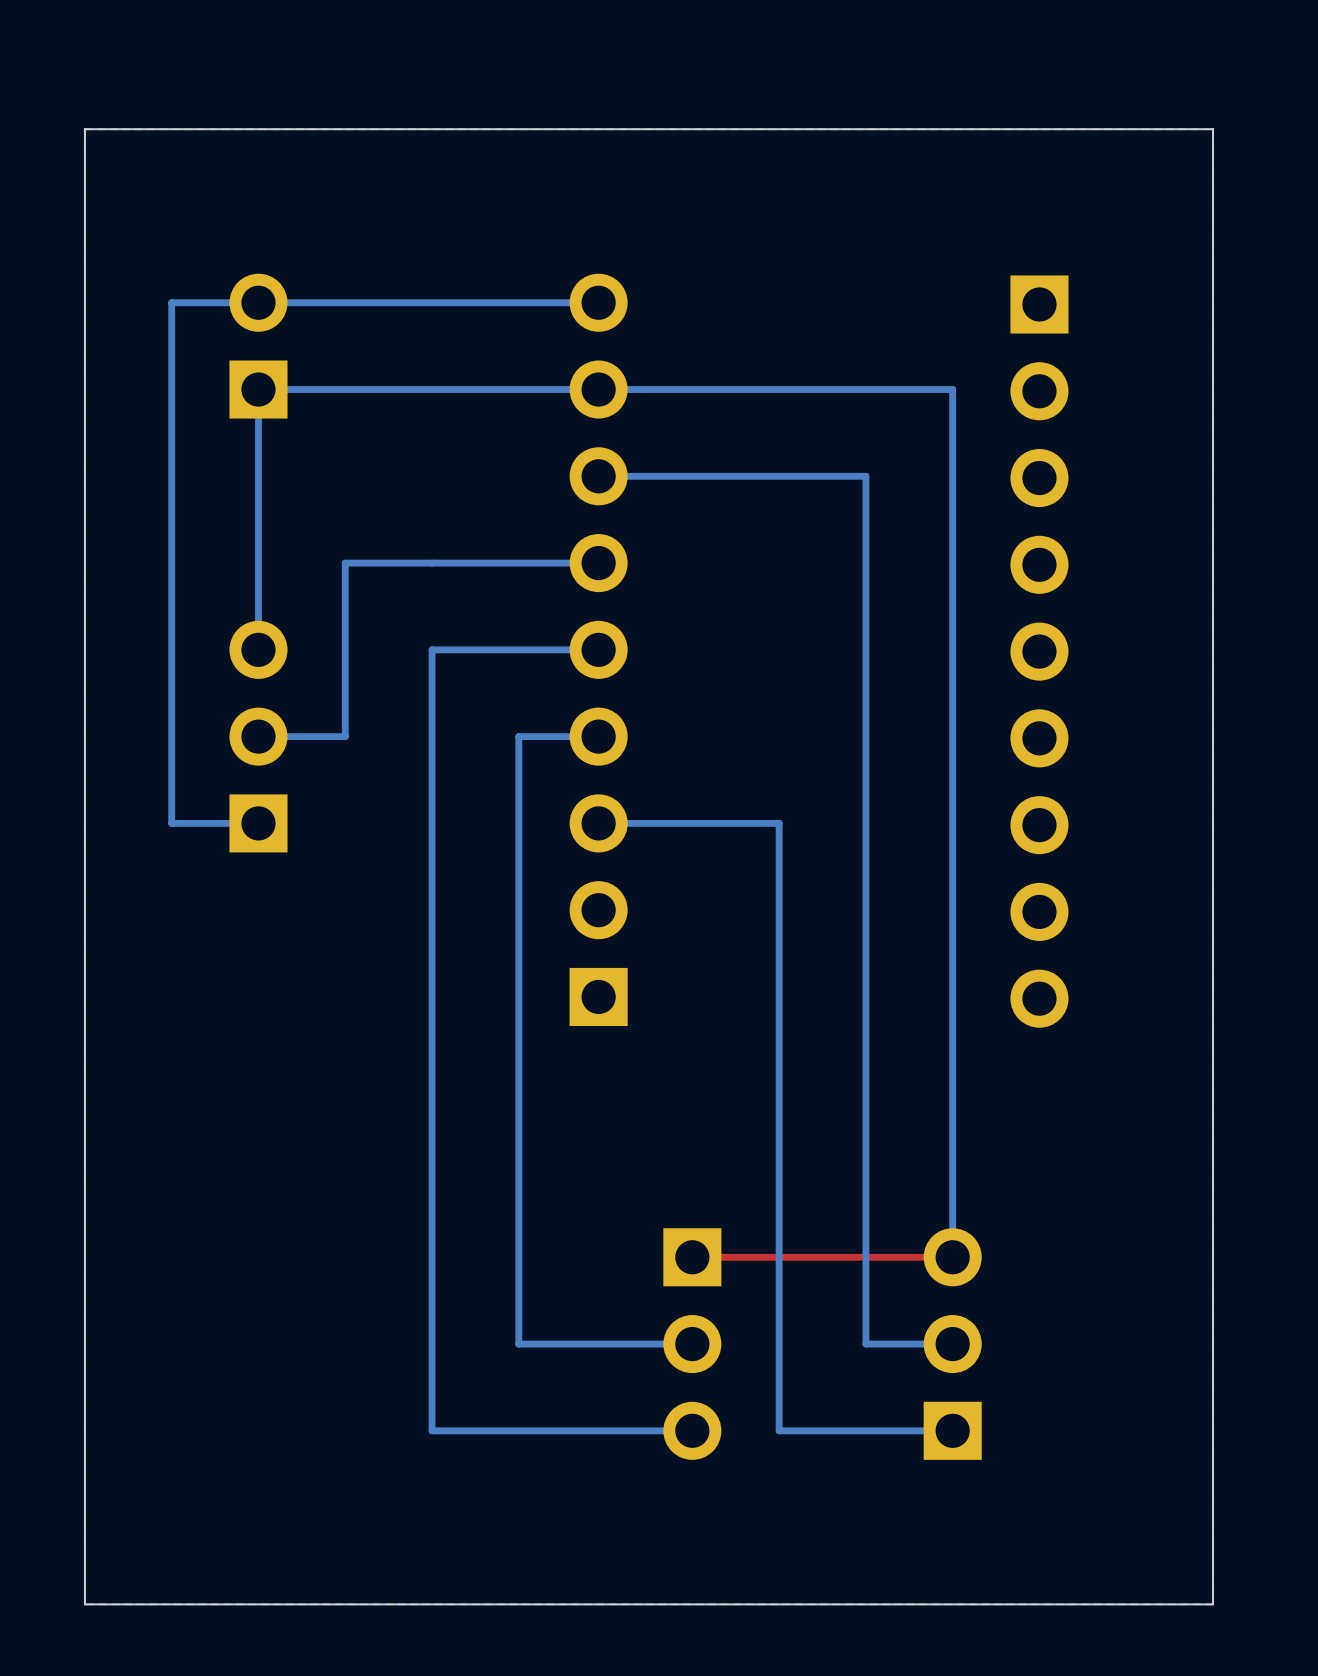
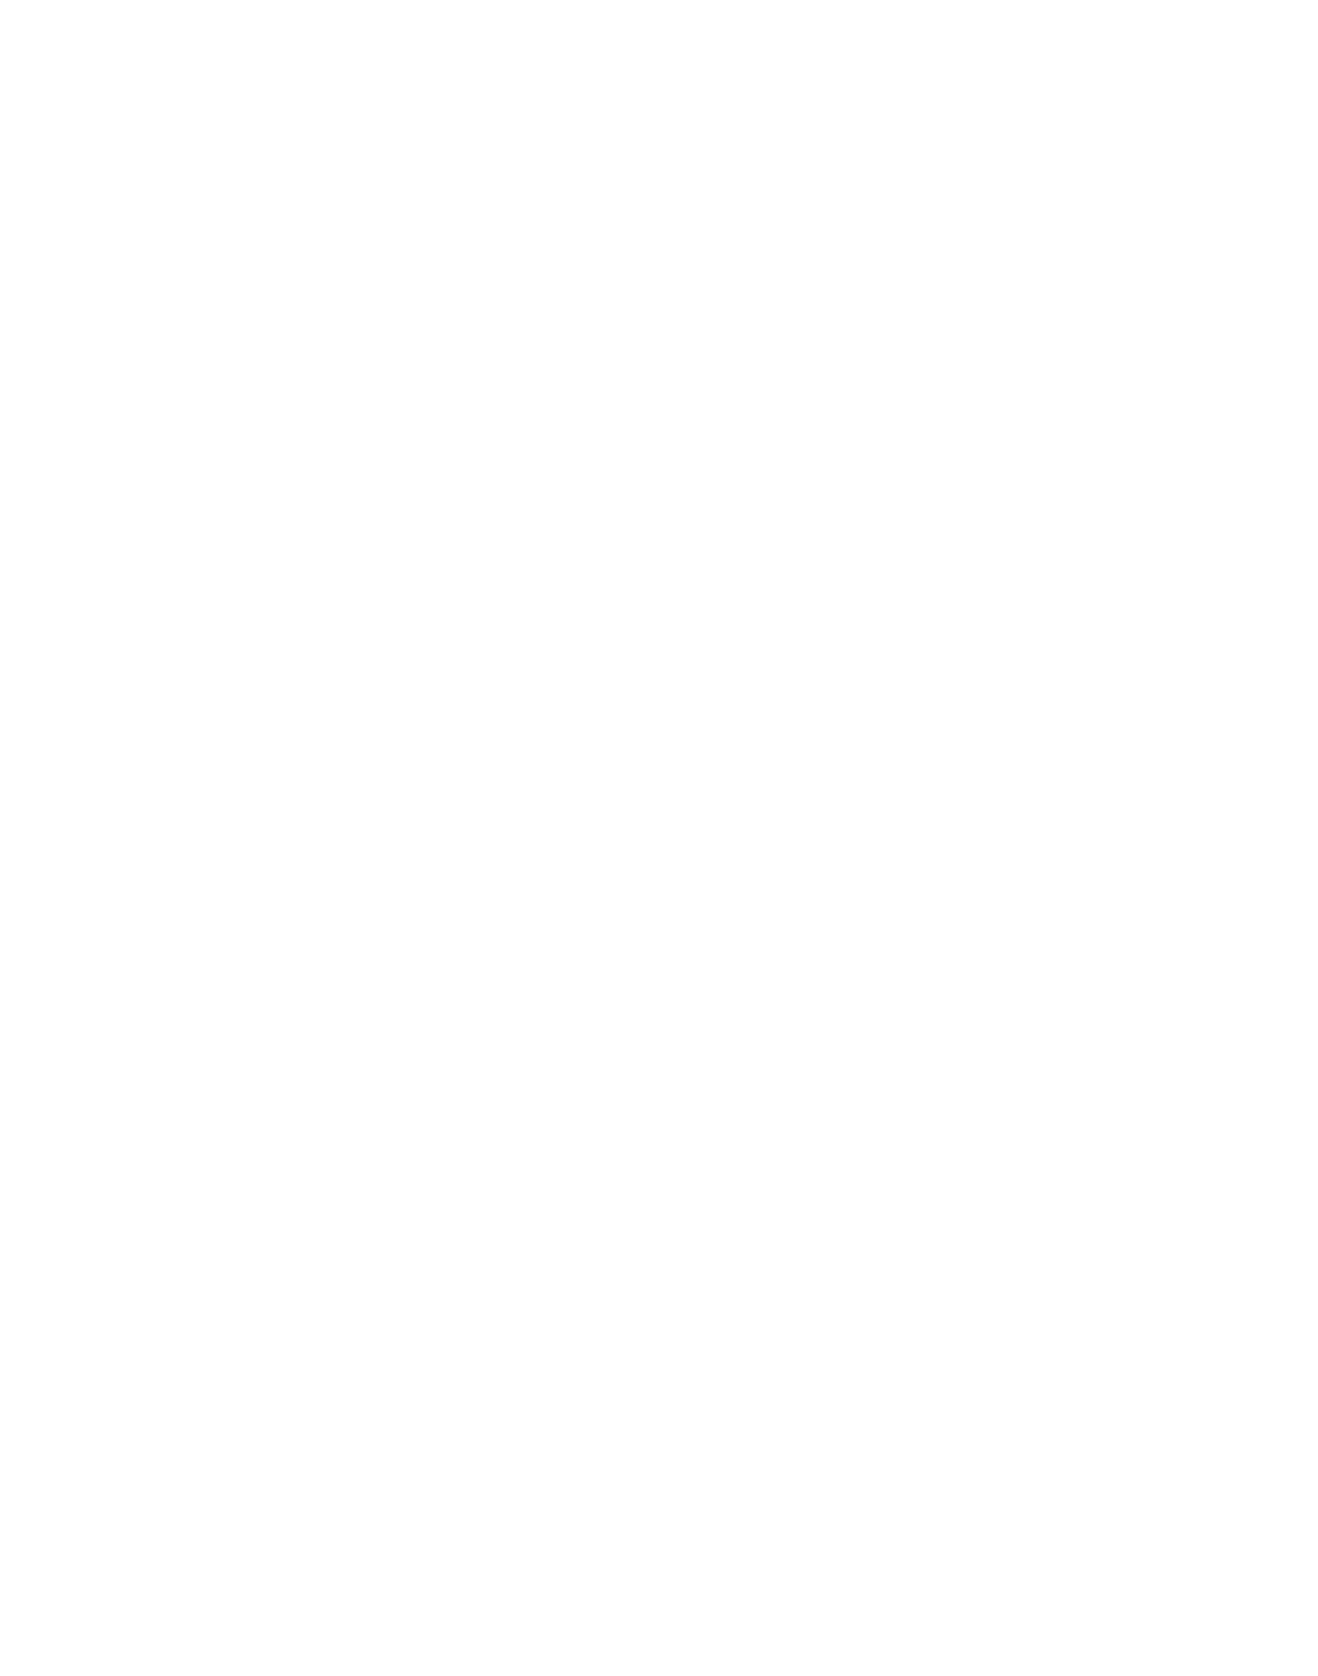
board edge: (1213, 129) (84, 129) (84, 1604) (1213, 1604) (1213, 129) -> none
bottom track: (598, 302) (171, 302) (171, 823) (258, 823) -> none
part: (258, 346) -> none
bottom track: (598, 476) (865, 476) (865, 1344) (952, 1344) -> none
bottom track: (598, 563) (345, 563) (345, 736) (258, 736) -> none
bottom track: (258, 649) (258, 389) (952, 389) (952, 1257) -> none
bottom track: (598, 649) (432, 649) (432, 1430) (692, 1430) -> none
part: (598, 649) -> none
part: (1039, 651) -> none
part: (258, 736) -> none
bottom track: (598, 736) (518, 736) (518, 1344) (692, 1344) -> none
bottom track: (598, 823) (779, 823) (779, 1430) (952, 1430) -> none
top track: (952, 1257) (692, 1257) -> none
part: (692, 1344) -> none
part: (952, 1344) -> none

